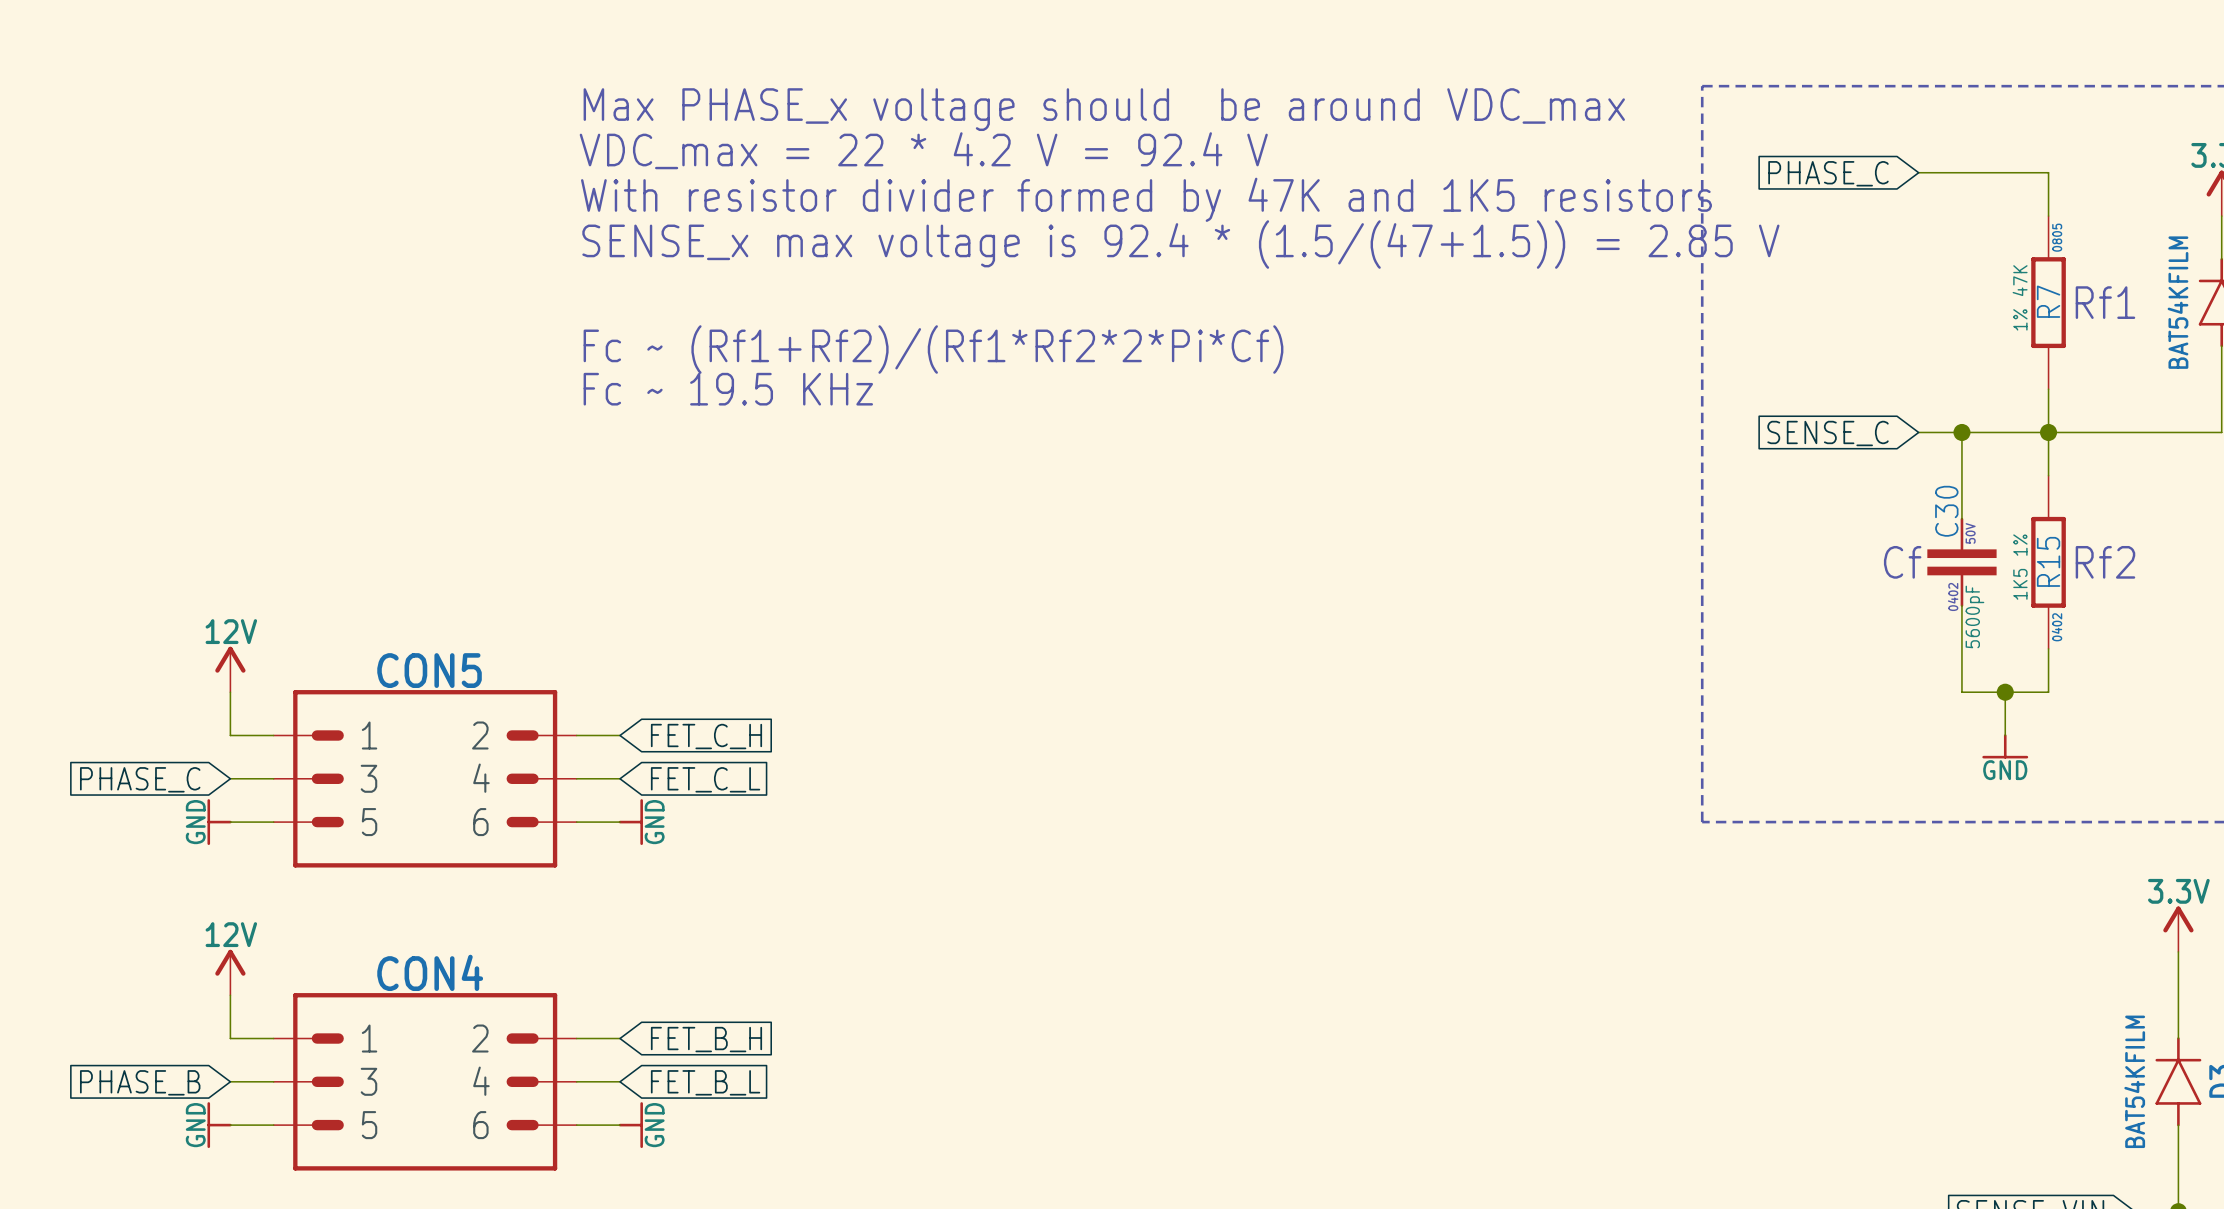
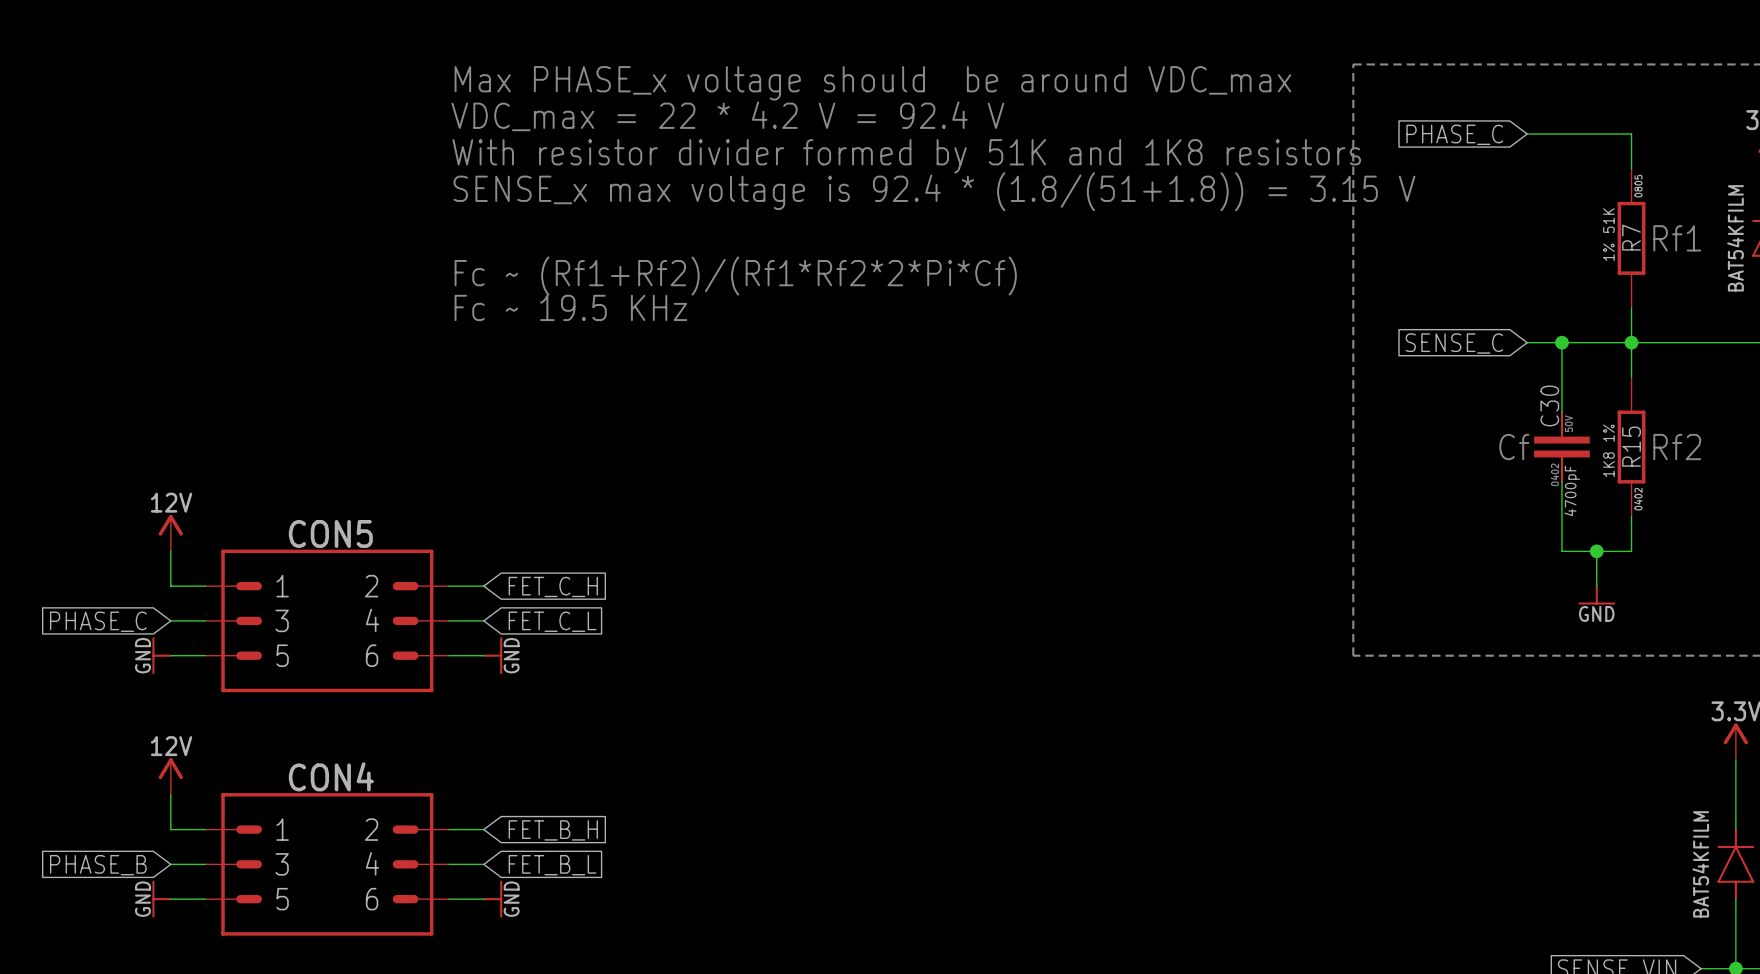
text: With resistor divider formed by 47K and 1K5 resistors (1146, 199) -> With resistor divider formed by 51K and 1K8 resistors (906, 156)
text: SENSE_x max voltage is 92.4 * (1.5/(47+1.5)) = 2.85 V (1180, 244) -> SENSE_x max voltage is 92.4 * (1.8/(51+1.8)) = 3.15 V (934, 191)
R7 value: 47K (2020, 280) -> 51K (1608, 220)
R15 value: 1K5 (2020, 584) -> 1K8 (1608, 464)
C30 value: 5600pF (1974, 616) -> 4700pF (1572, 490)

